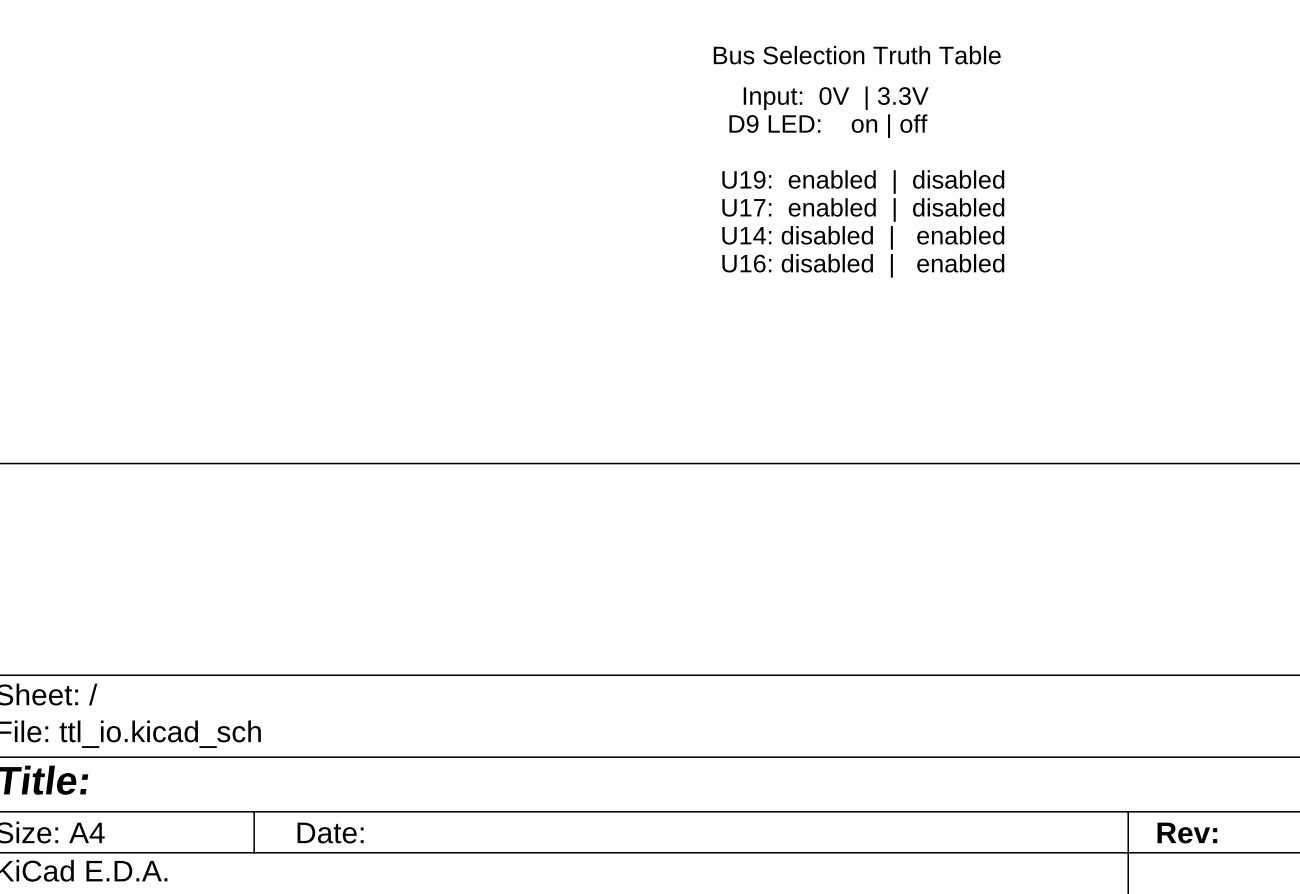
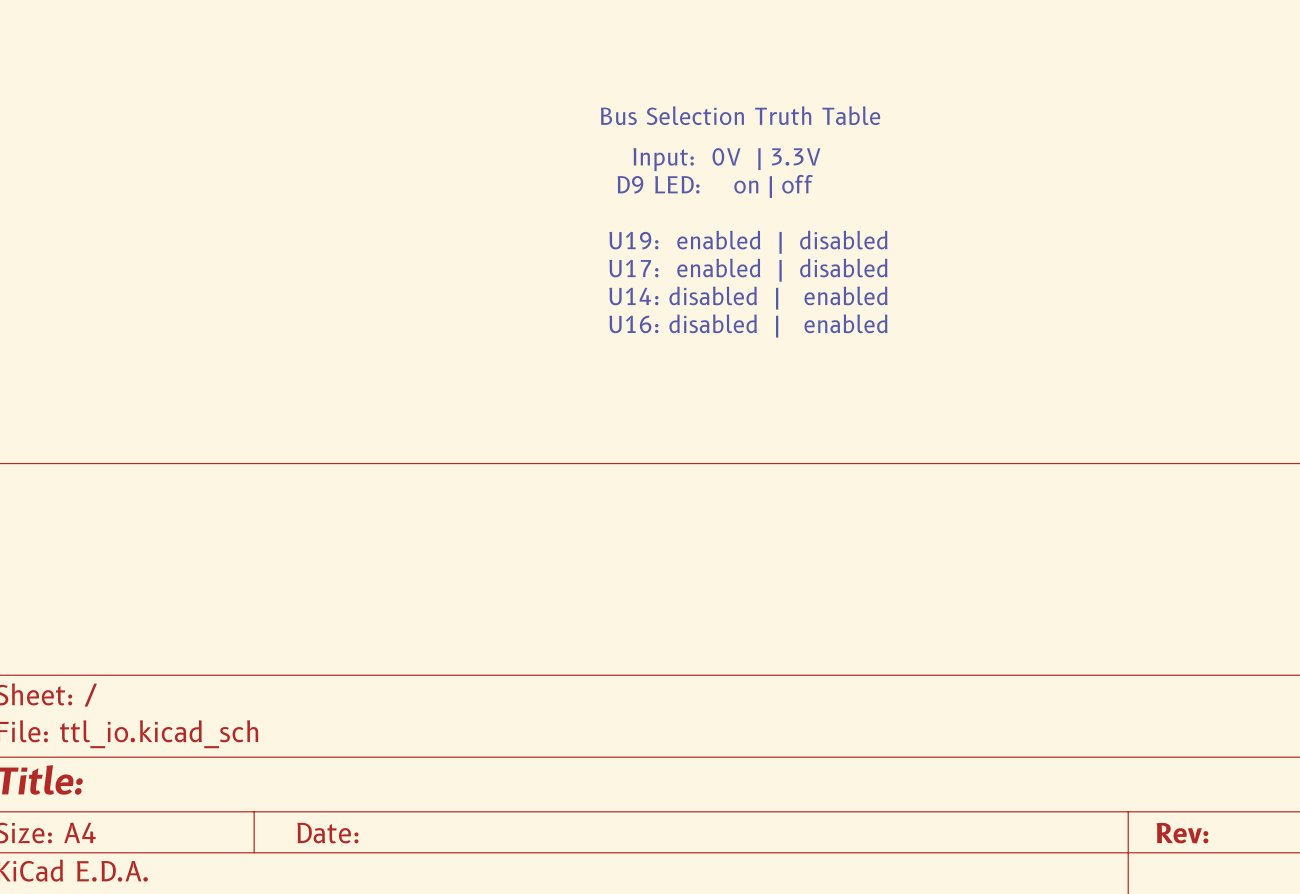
text position: Bus Selection Truth Table (857, 55) -> Bus Selection Truth Table (740, 115)
text position: Input: 0V | 3.3V (836, 98) -> Input: 0V | 3.3V (726, 159)
text position: D9 LED: on | off (828, 126) -> D9 LED: on | off (715, 186)
text position: U19: enabled | disabled (863, 182) -> U19: enabled | disabled (748, 242)
text position: U17: enabled | disabled (863, 209) -> U17: enabled | disabled (748, 270)
text position: U14: disabled | enabled (863, 237) -> U14: disabled | enabled (748, 298)
text position: U16: disabled | enabled (863, 265) -> U16: disabled | enabled (748, 326)

